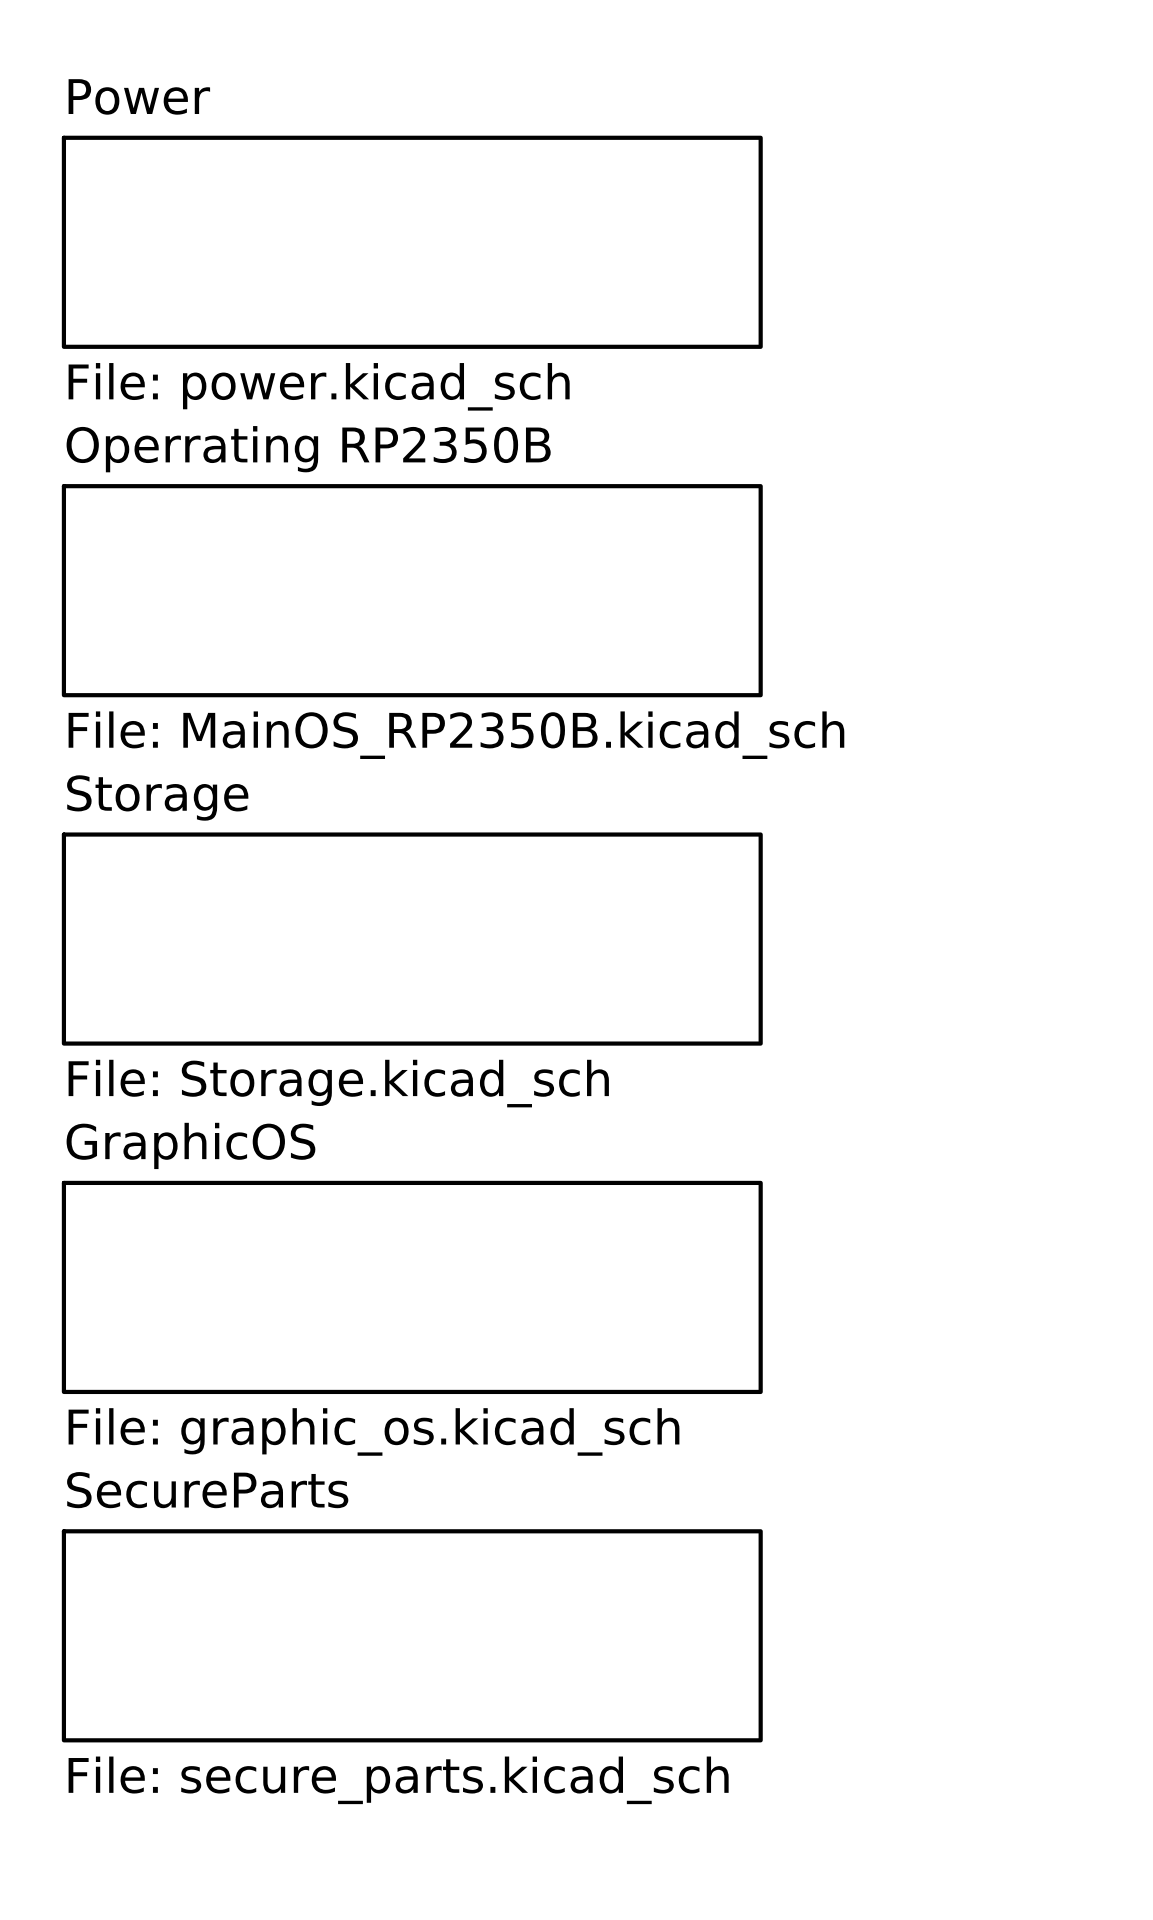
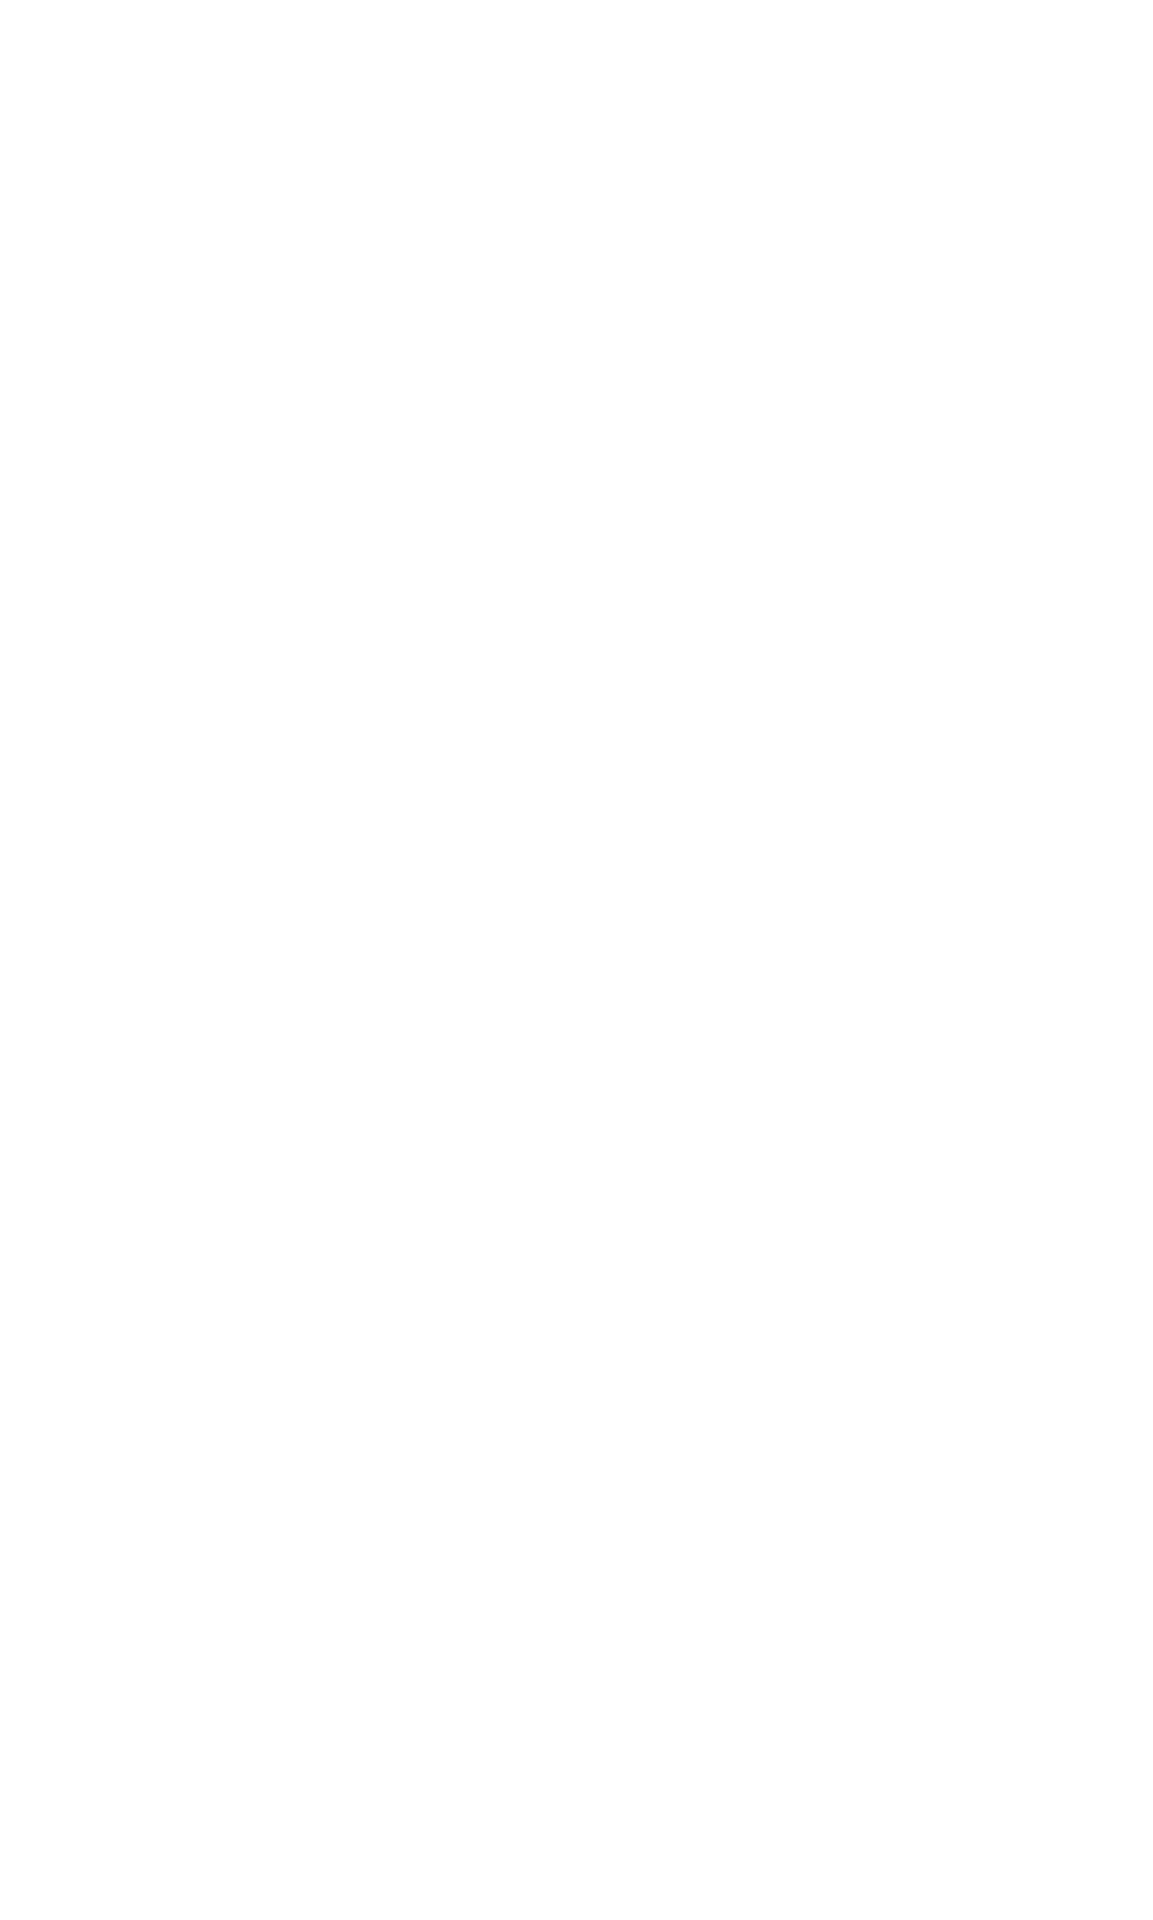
sheet Power: File: power.kicad_sch (412, 242) -> none
sheet Operrating RP2350B: File: MainOS_RP2350B.kicad_sch (412, 590) -> none
sheet Storage: File: Storage.kicad_sch (412, 939) -> none
sheet GraphicOS: File: graphic_os.kicad_sch (412, 1287) -> none
sheet SecureParts: File: secure_parts.kicad_sch (412, 1635) -> none

